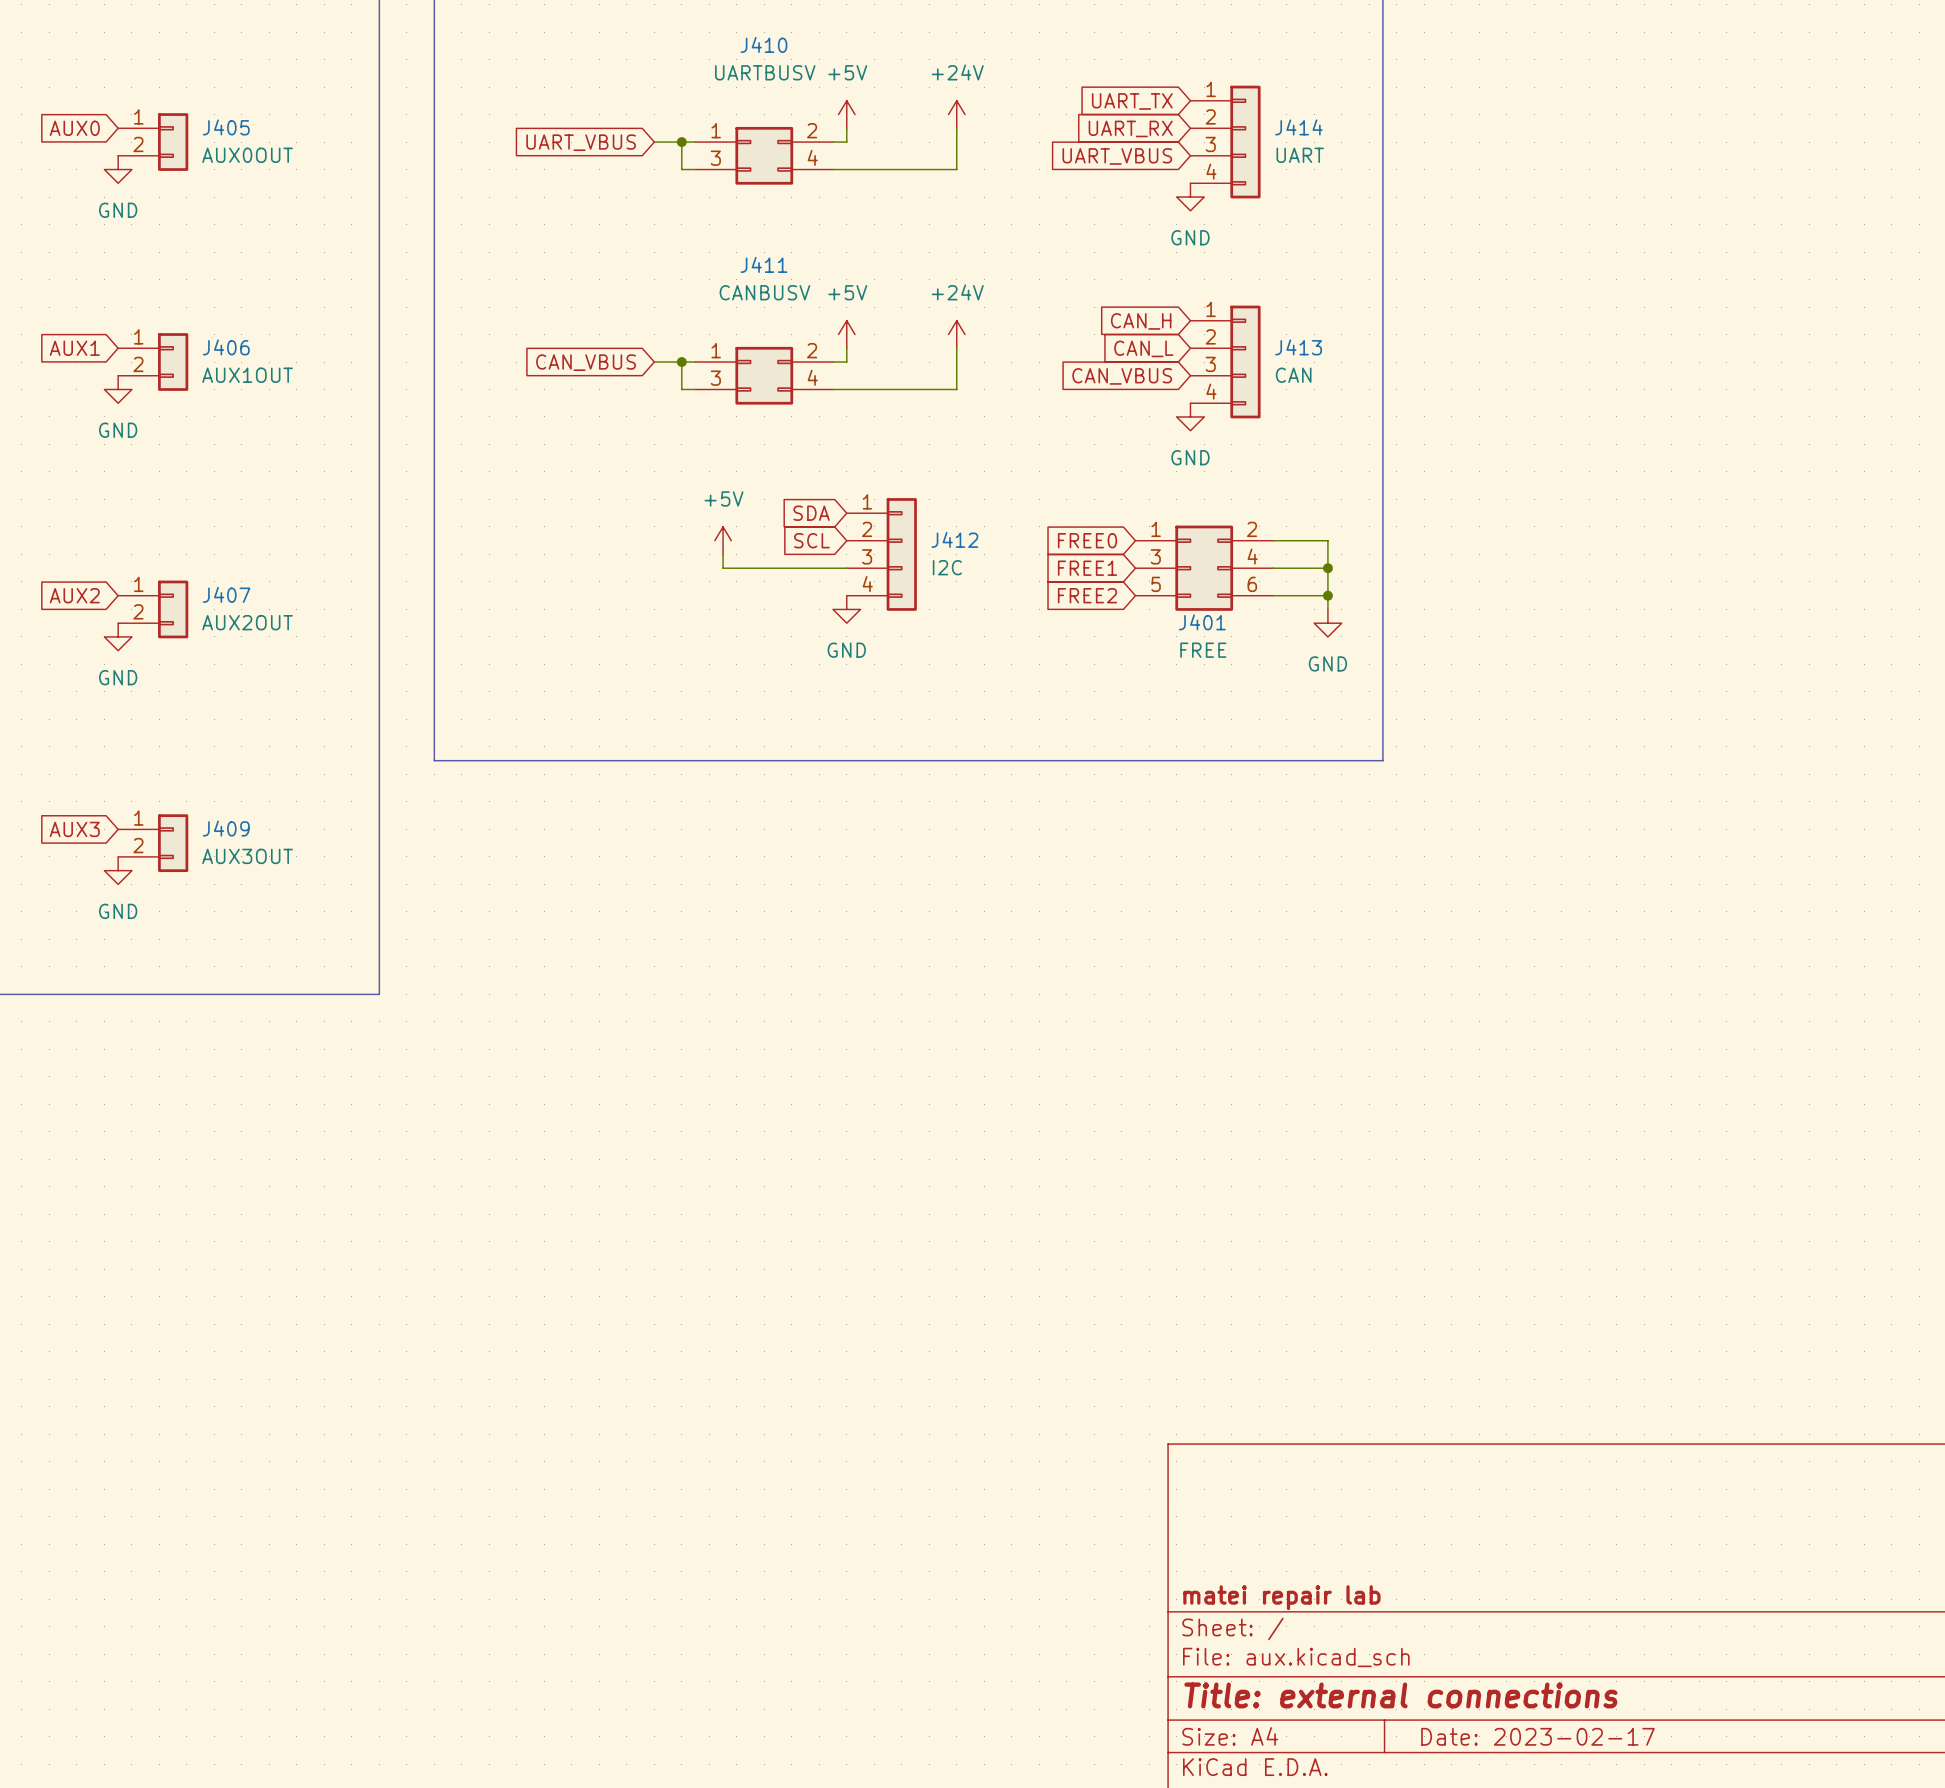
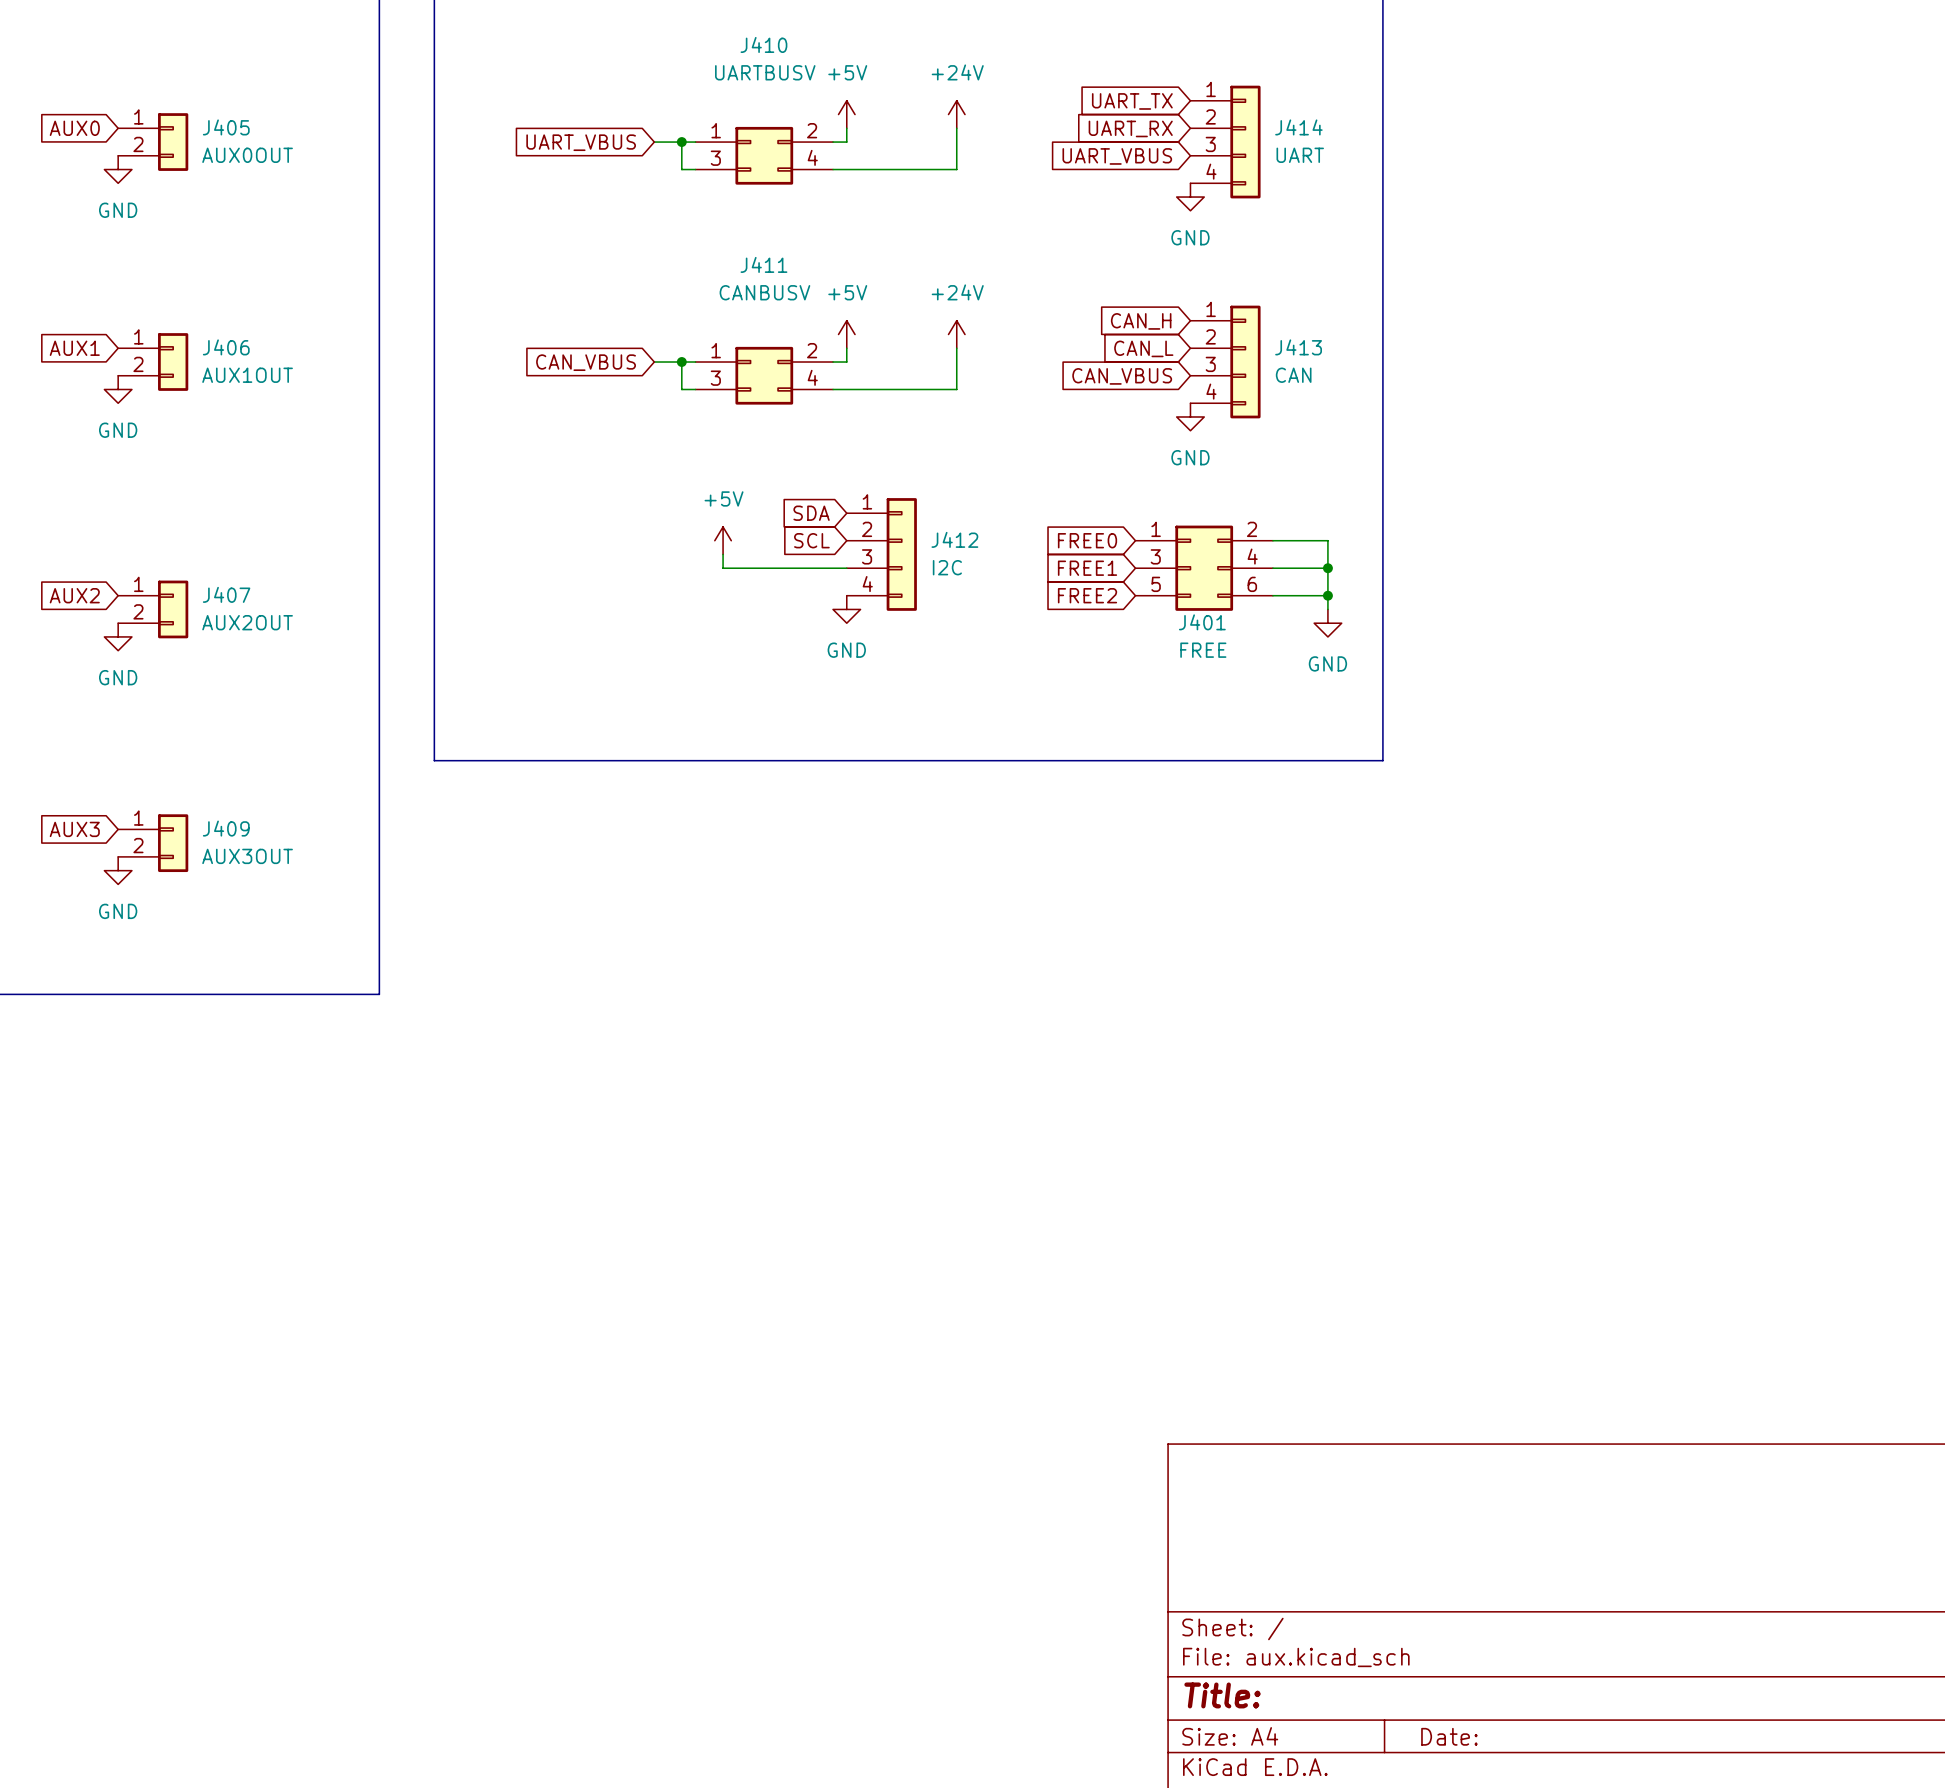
title block: matei repair lab (1281, 1597) -> none
title block: Title: external connections (1400, 1695) -> Title: (1222, 1695)
title block: Date: 2023-02-17 (1537, 1736) -> Date: (1449, 1736)

